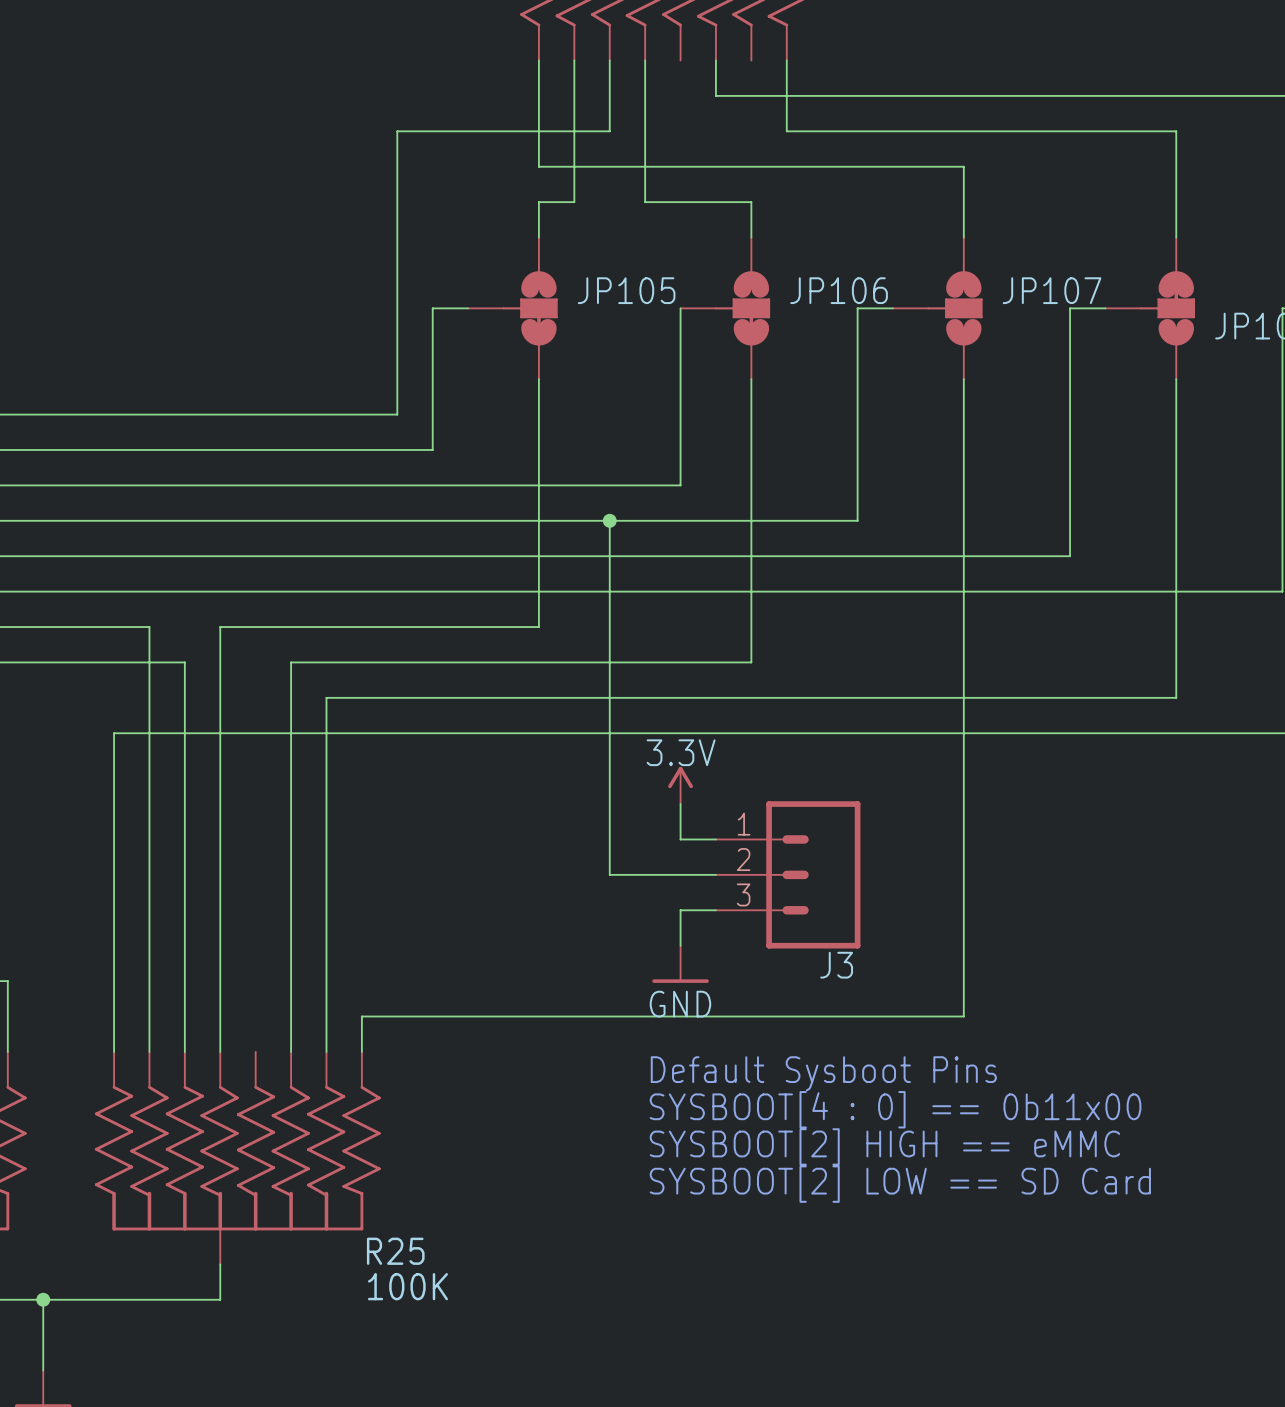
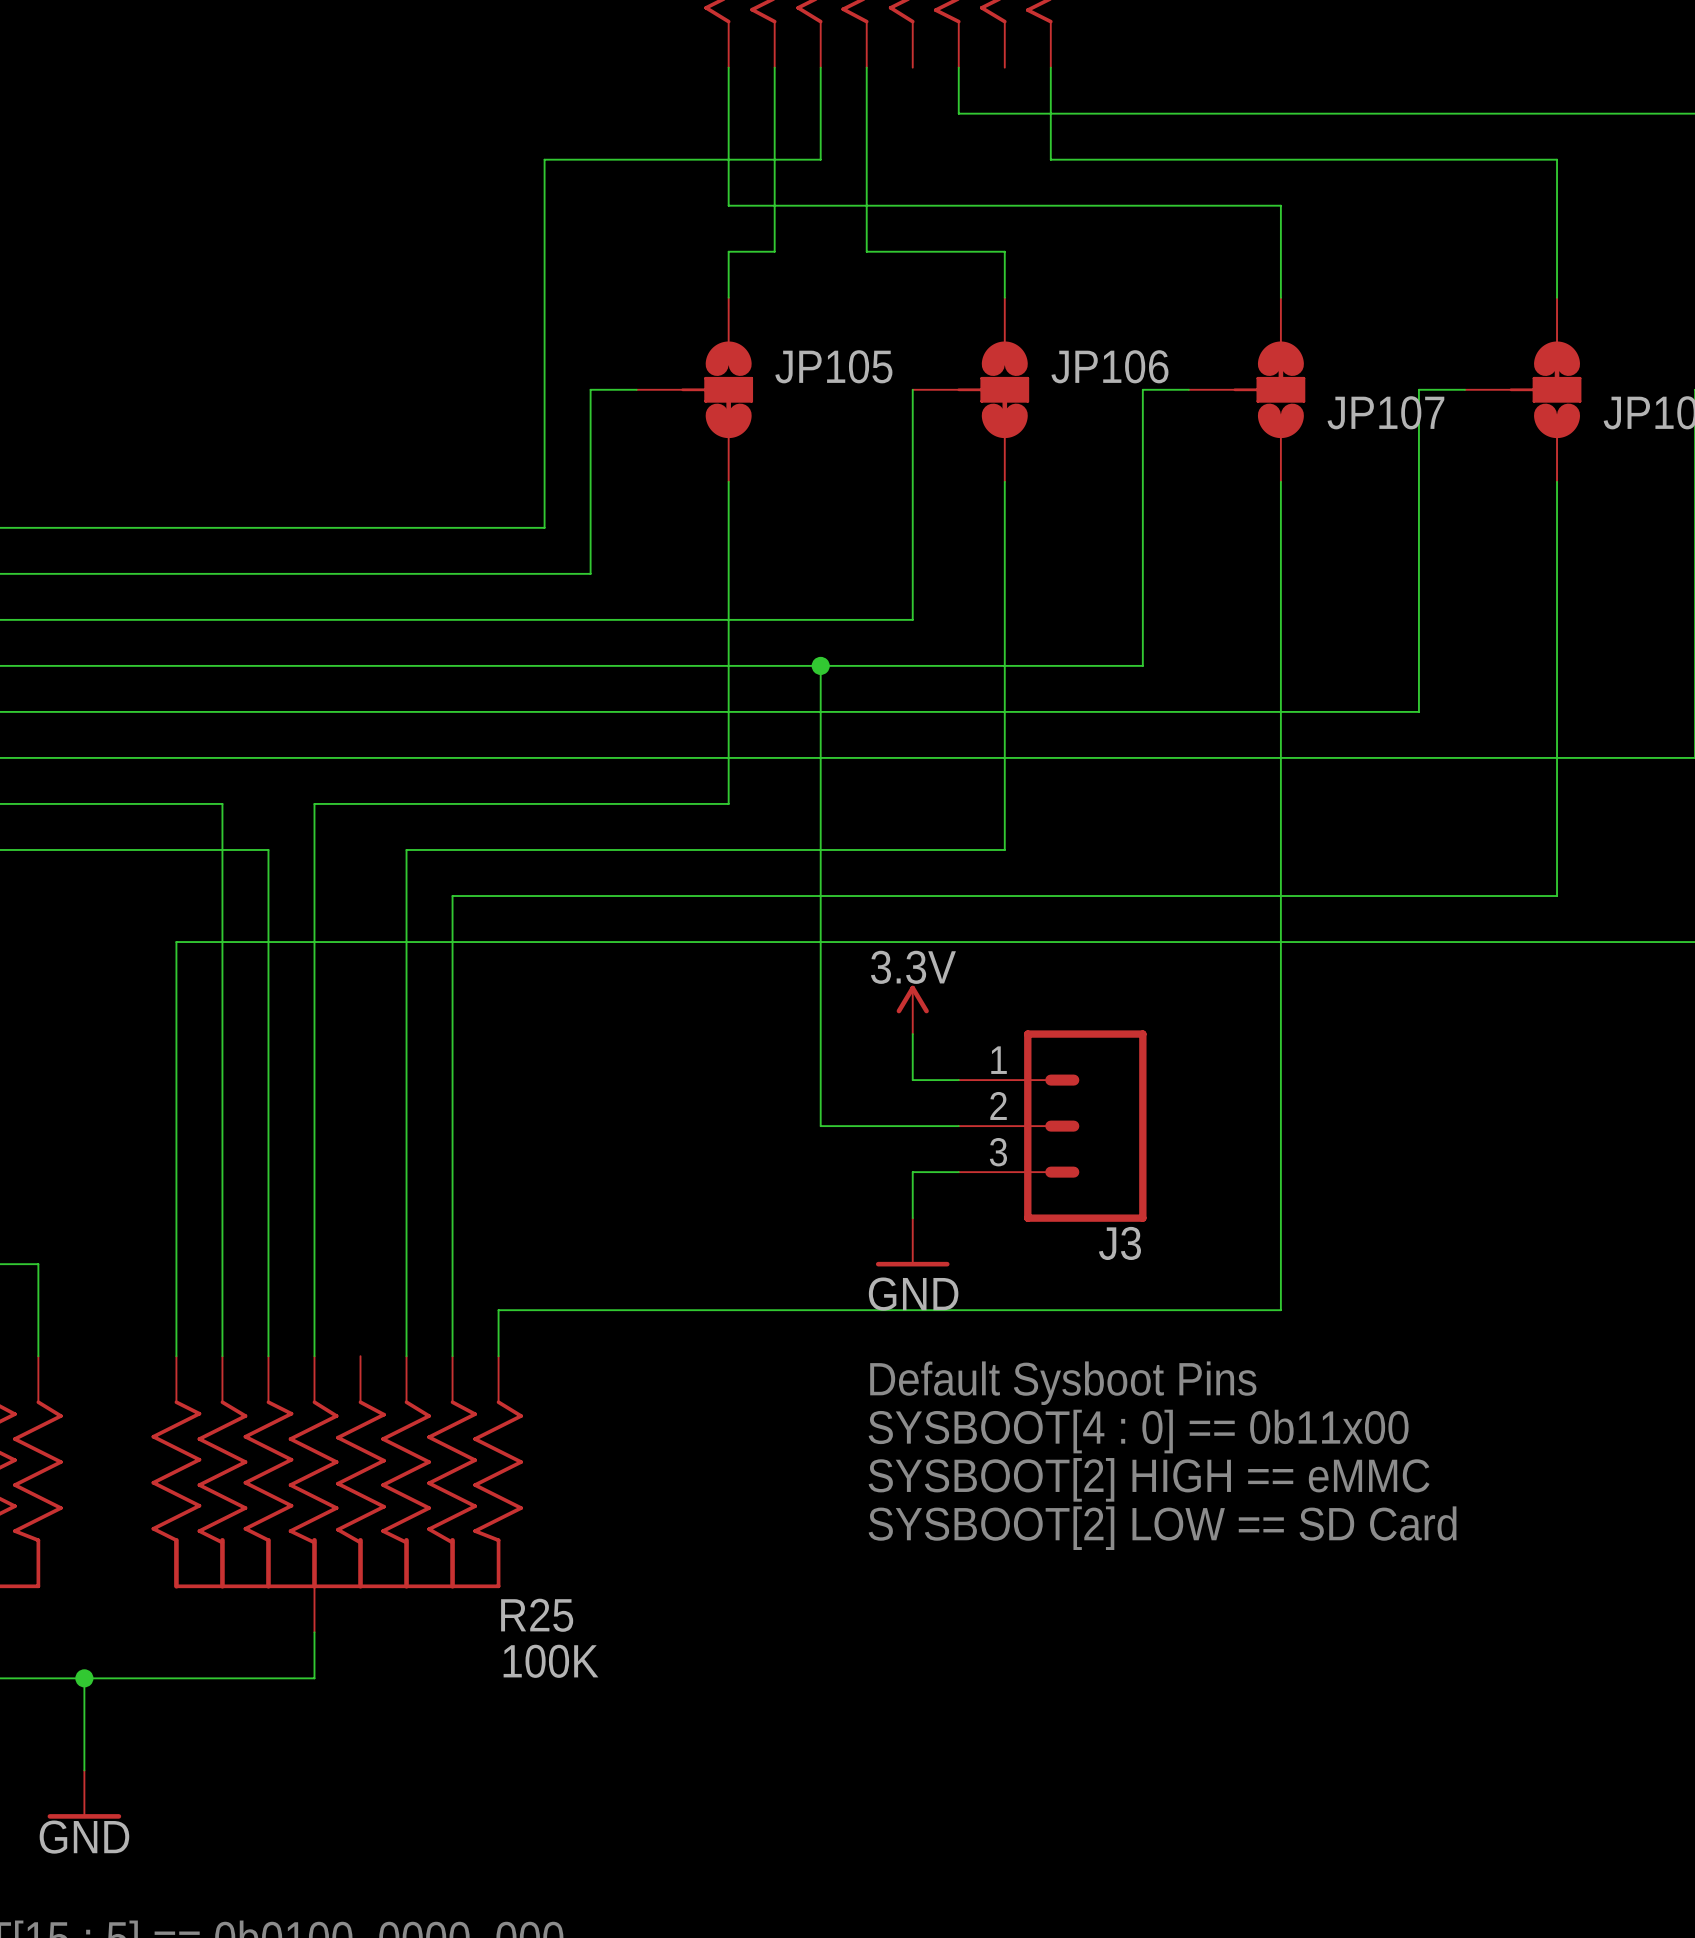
JP107 symbol: [893, 237, 983, 380] -> [1188, 297, 1306, 482]
JP107 name position: JP107 (1052, 290) -> JP107 (1385, 412)

